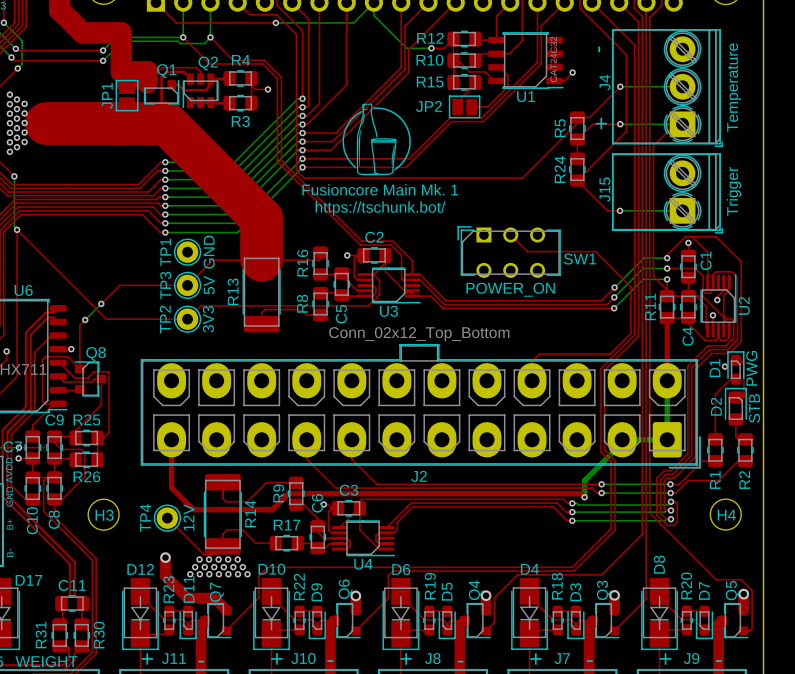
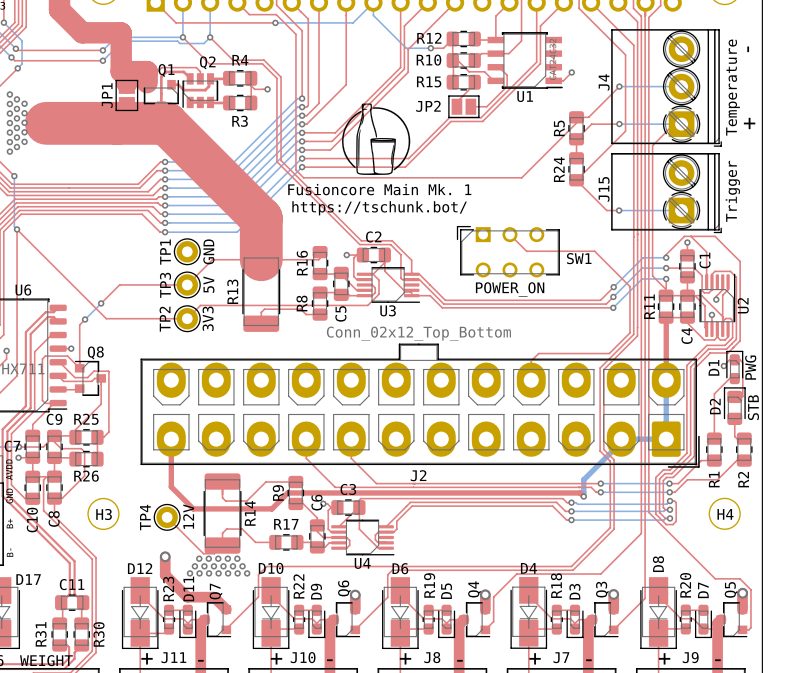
text position: - (599, 49) -> - (748, 49)
text position: + (601, 123) -> + (749, 123)

